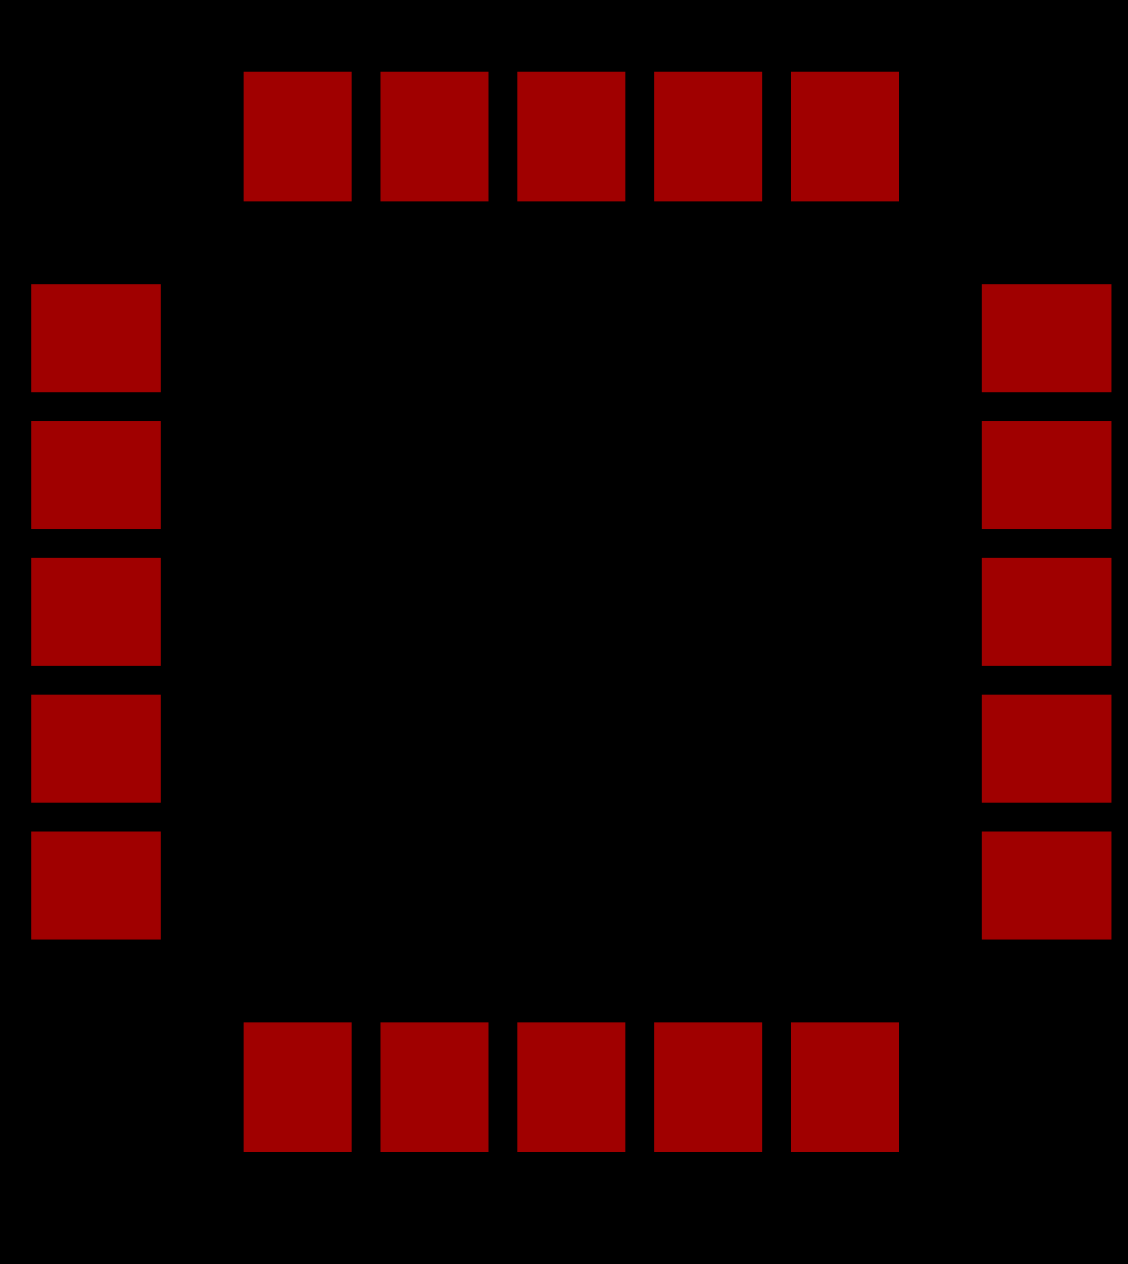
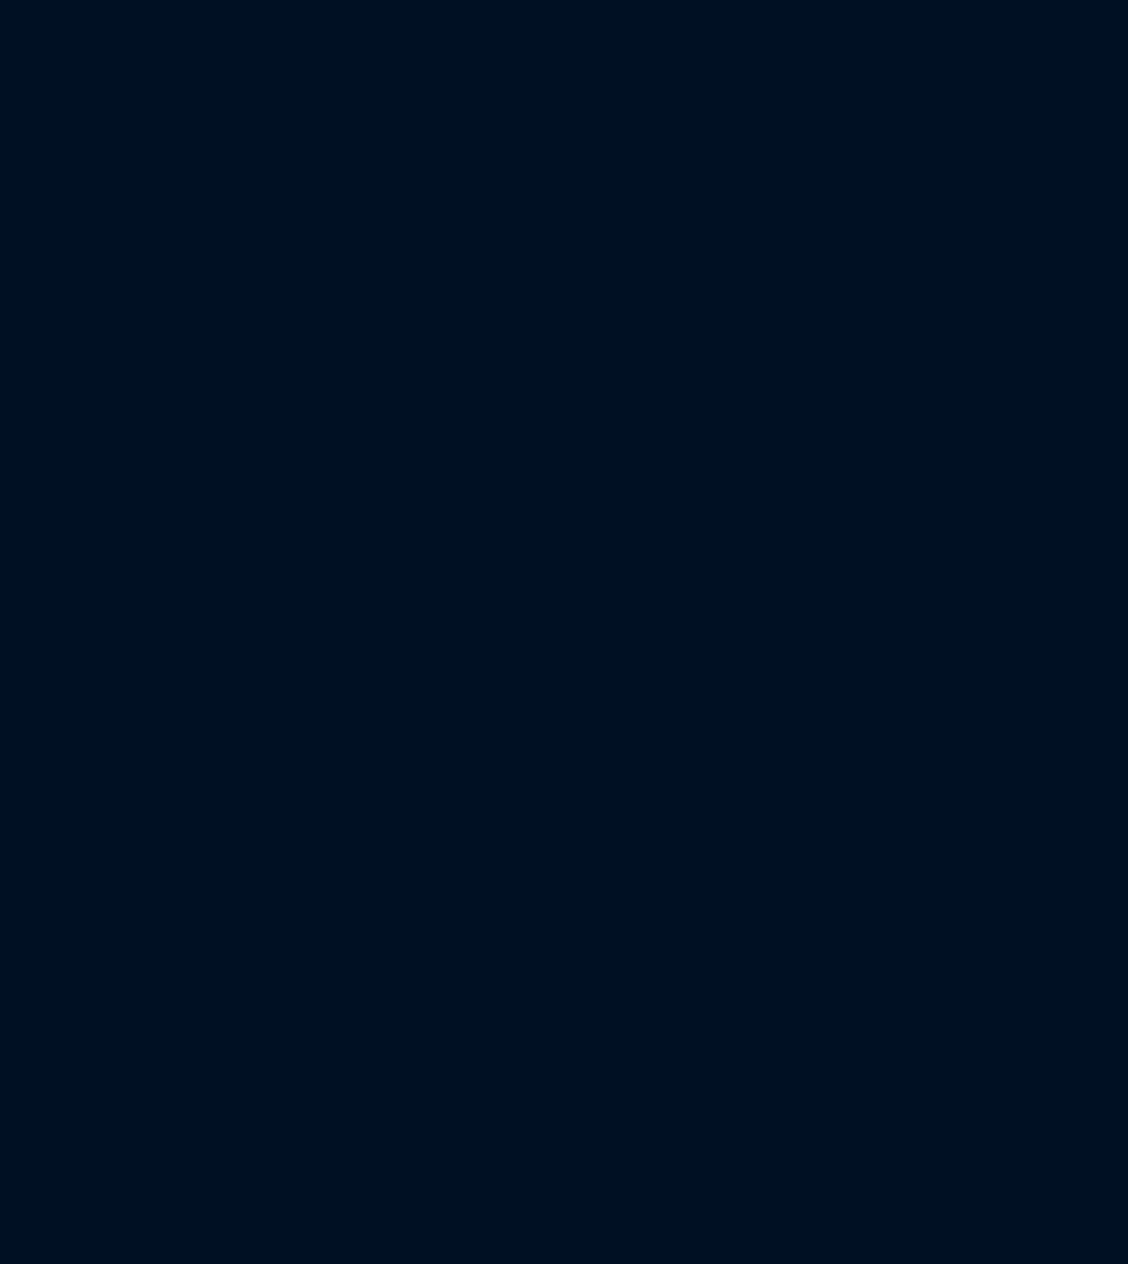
part: (571, 611) -> none

